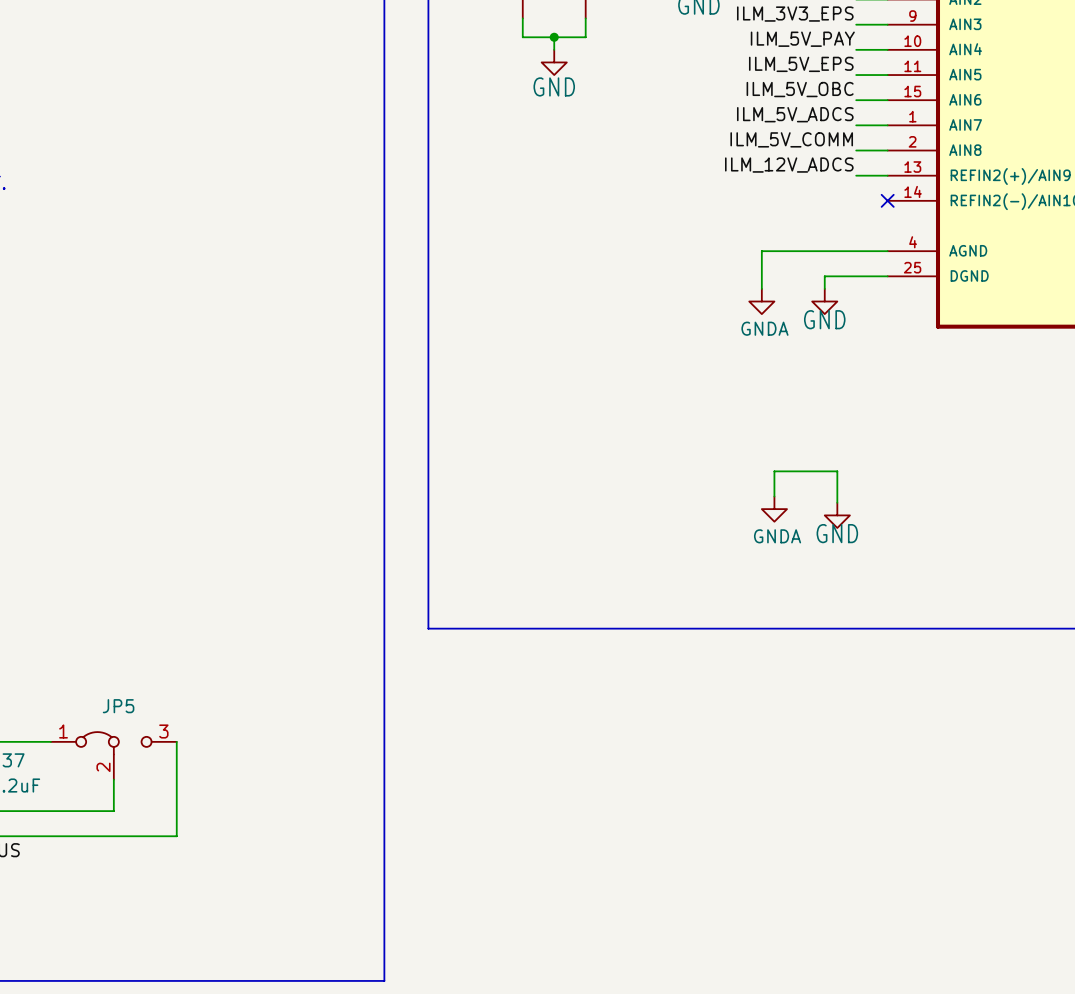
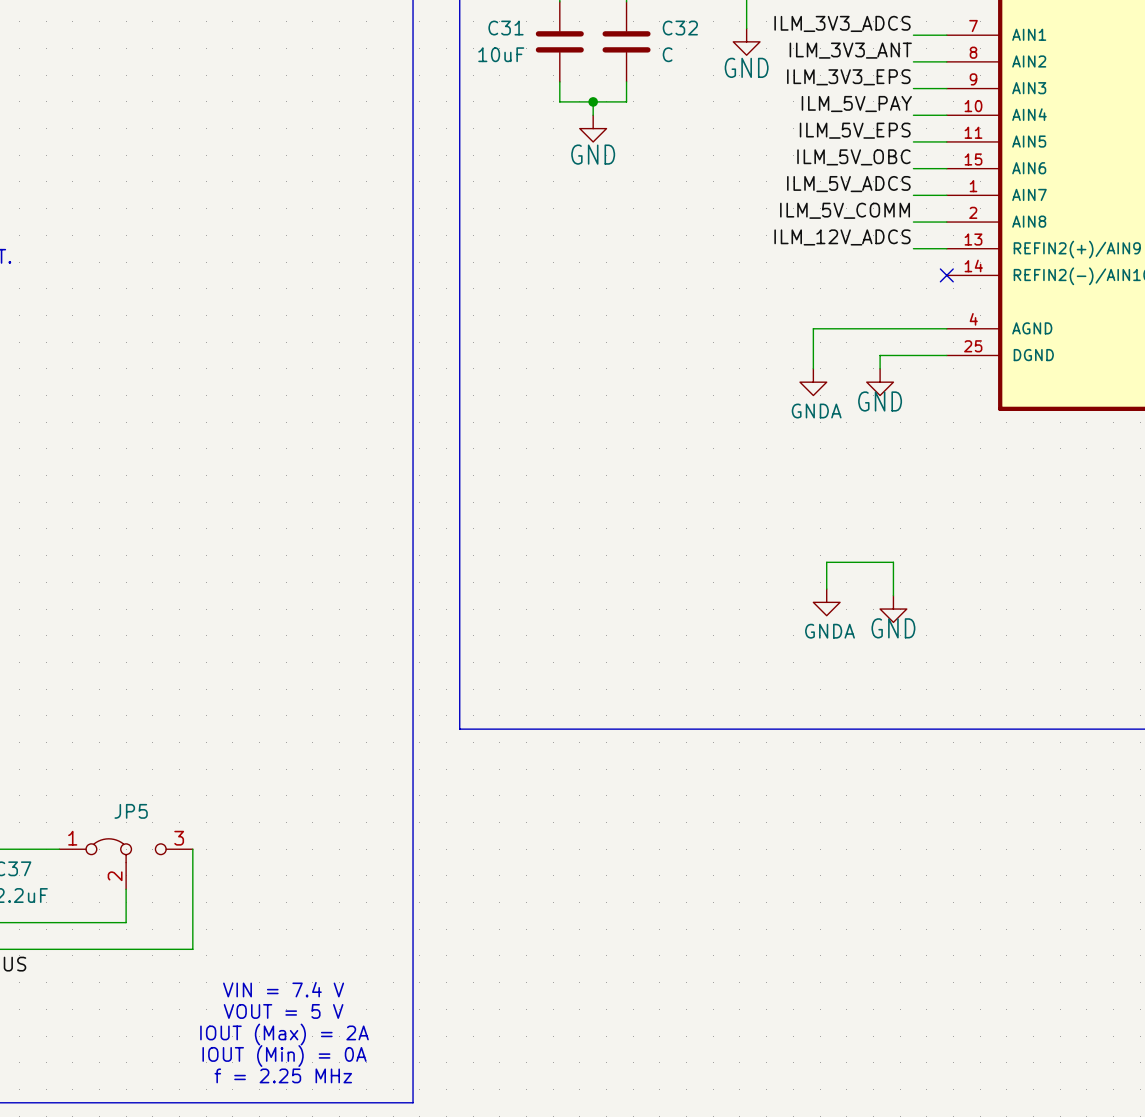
text: none -> VIN = 7.4 V (283, 989)
text: none -> VOUT = 5 V (283, 1011)
text: none -> IOUT (Max) = 2A (284, 1034)
text: none -> IOUT (Min) = 0A (284, 1056)
text: none -> f = 2.25 MHz (283, 1075)

